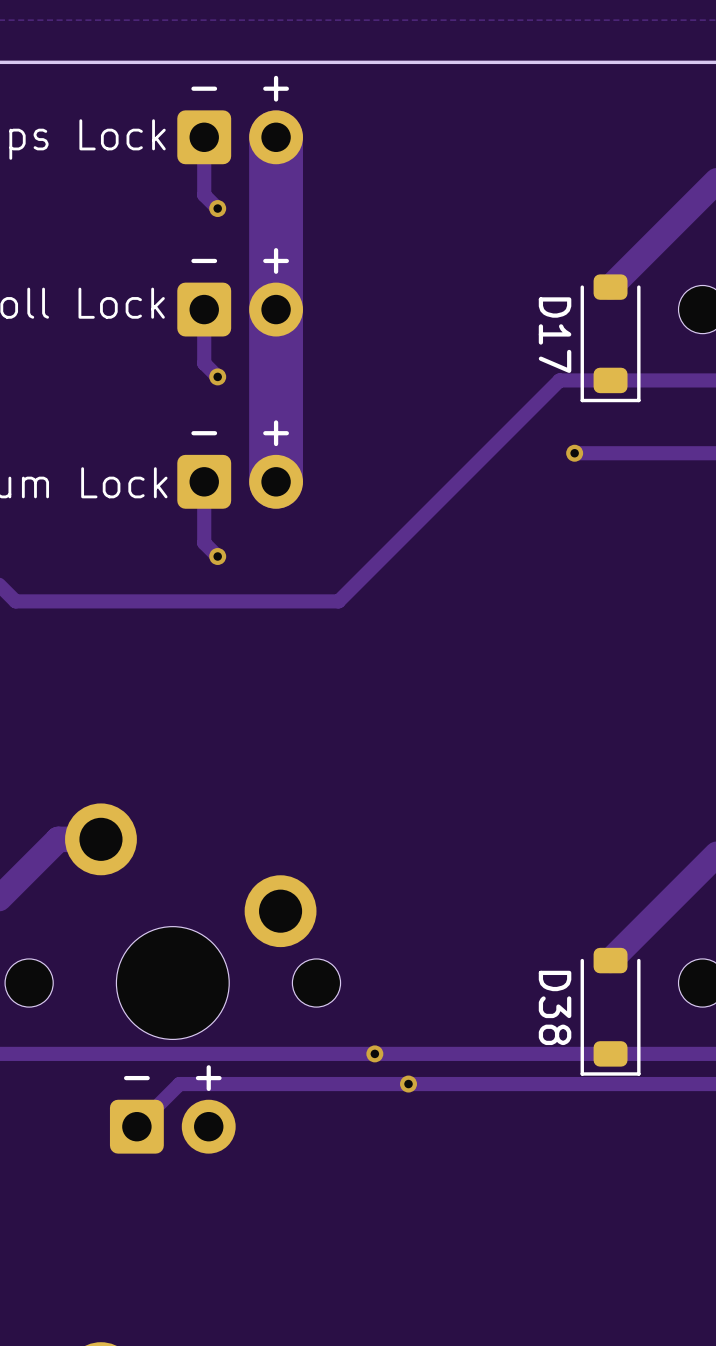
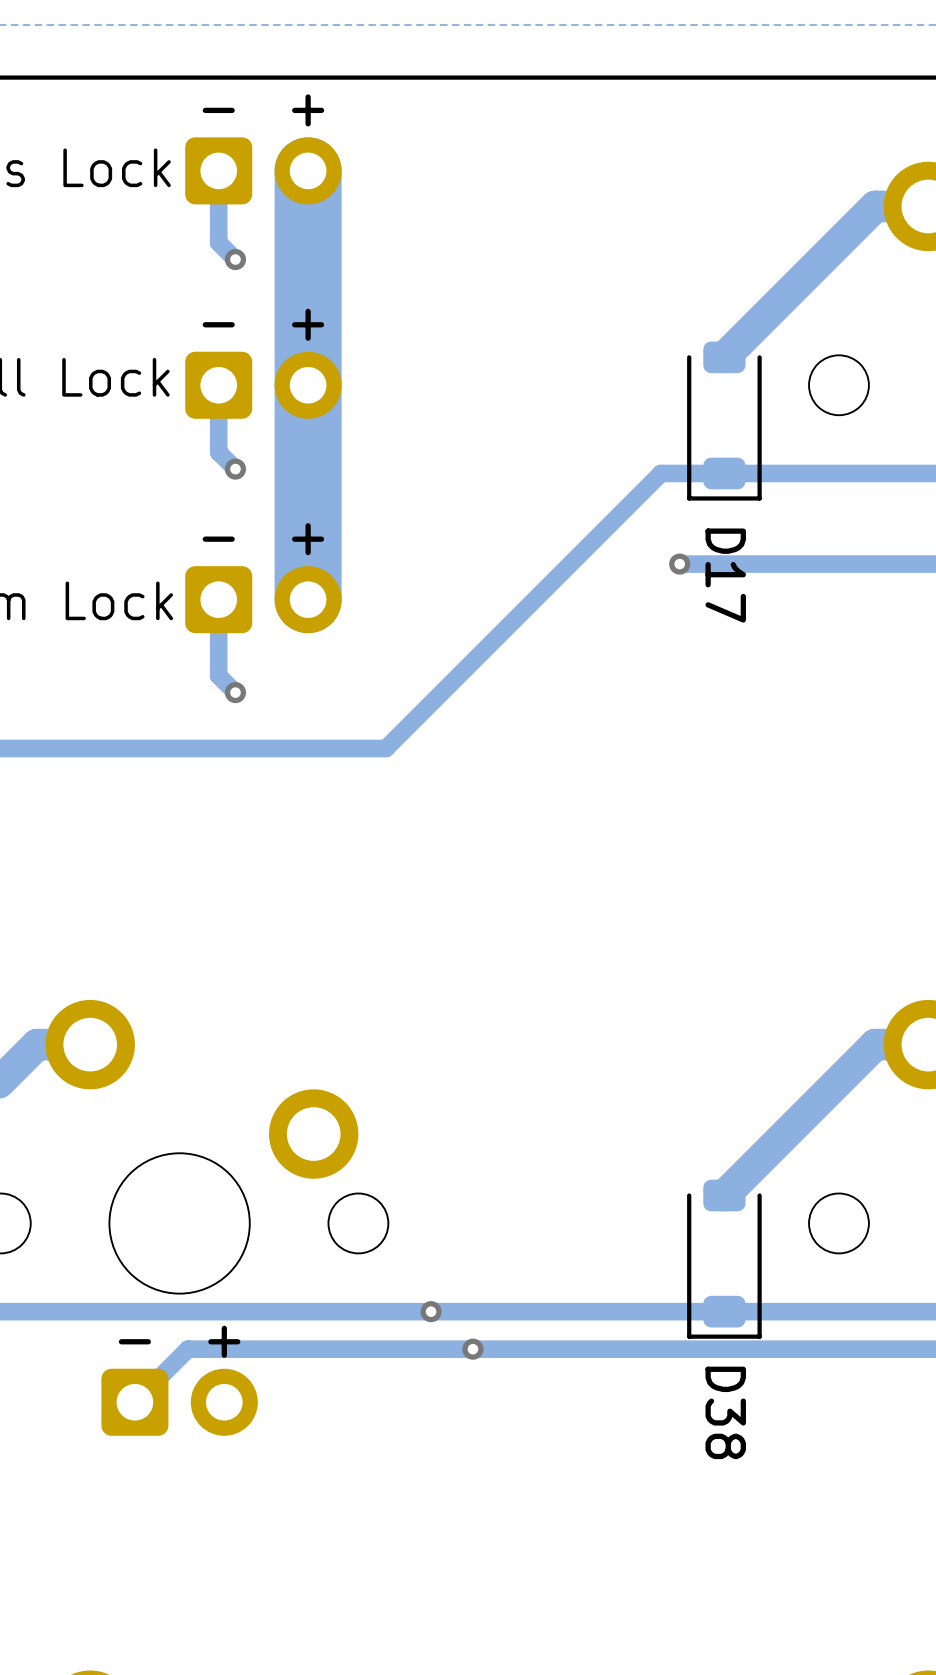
D17 name position: D17 (555, 335) -> D17 (725, 575)
D38 name position: D38 (555, 1007) -> D38 (725, 1412)

